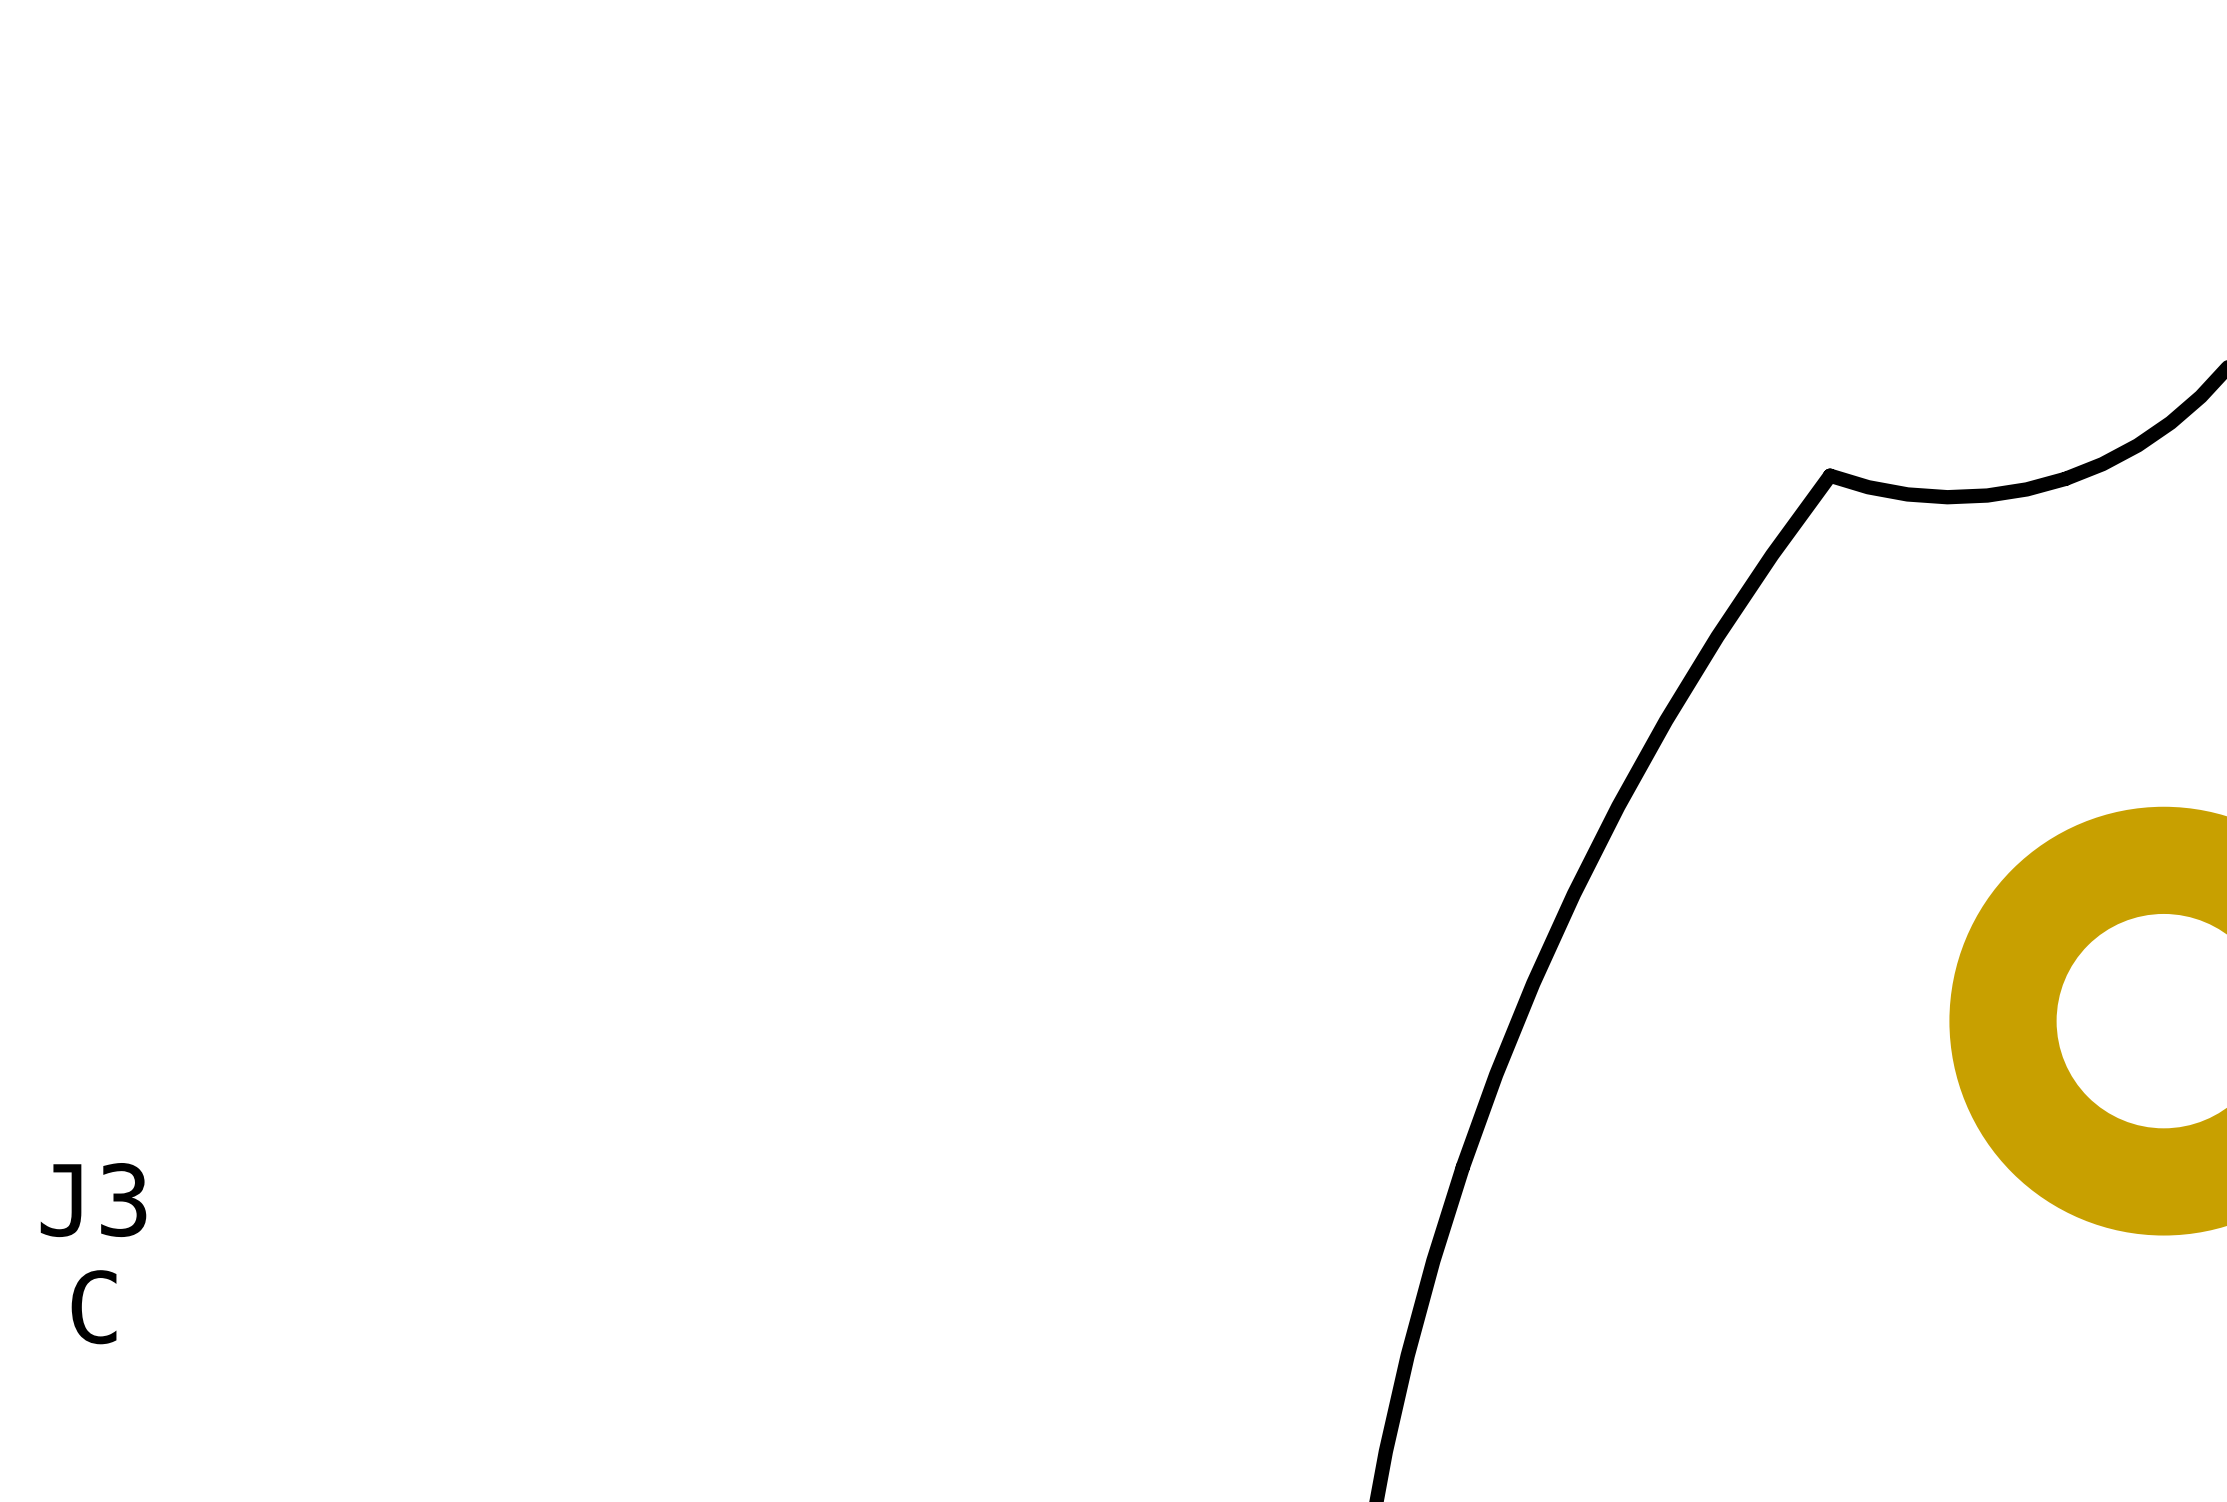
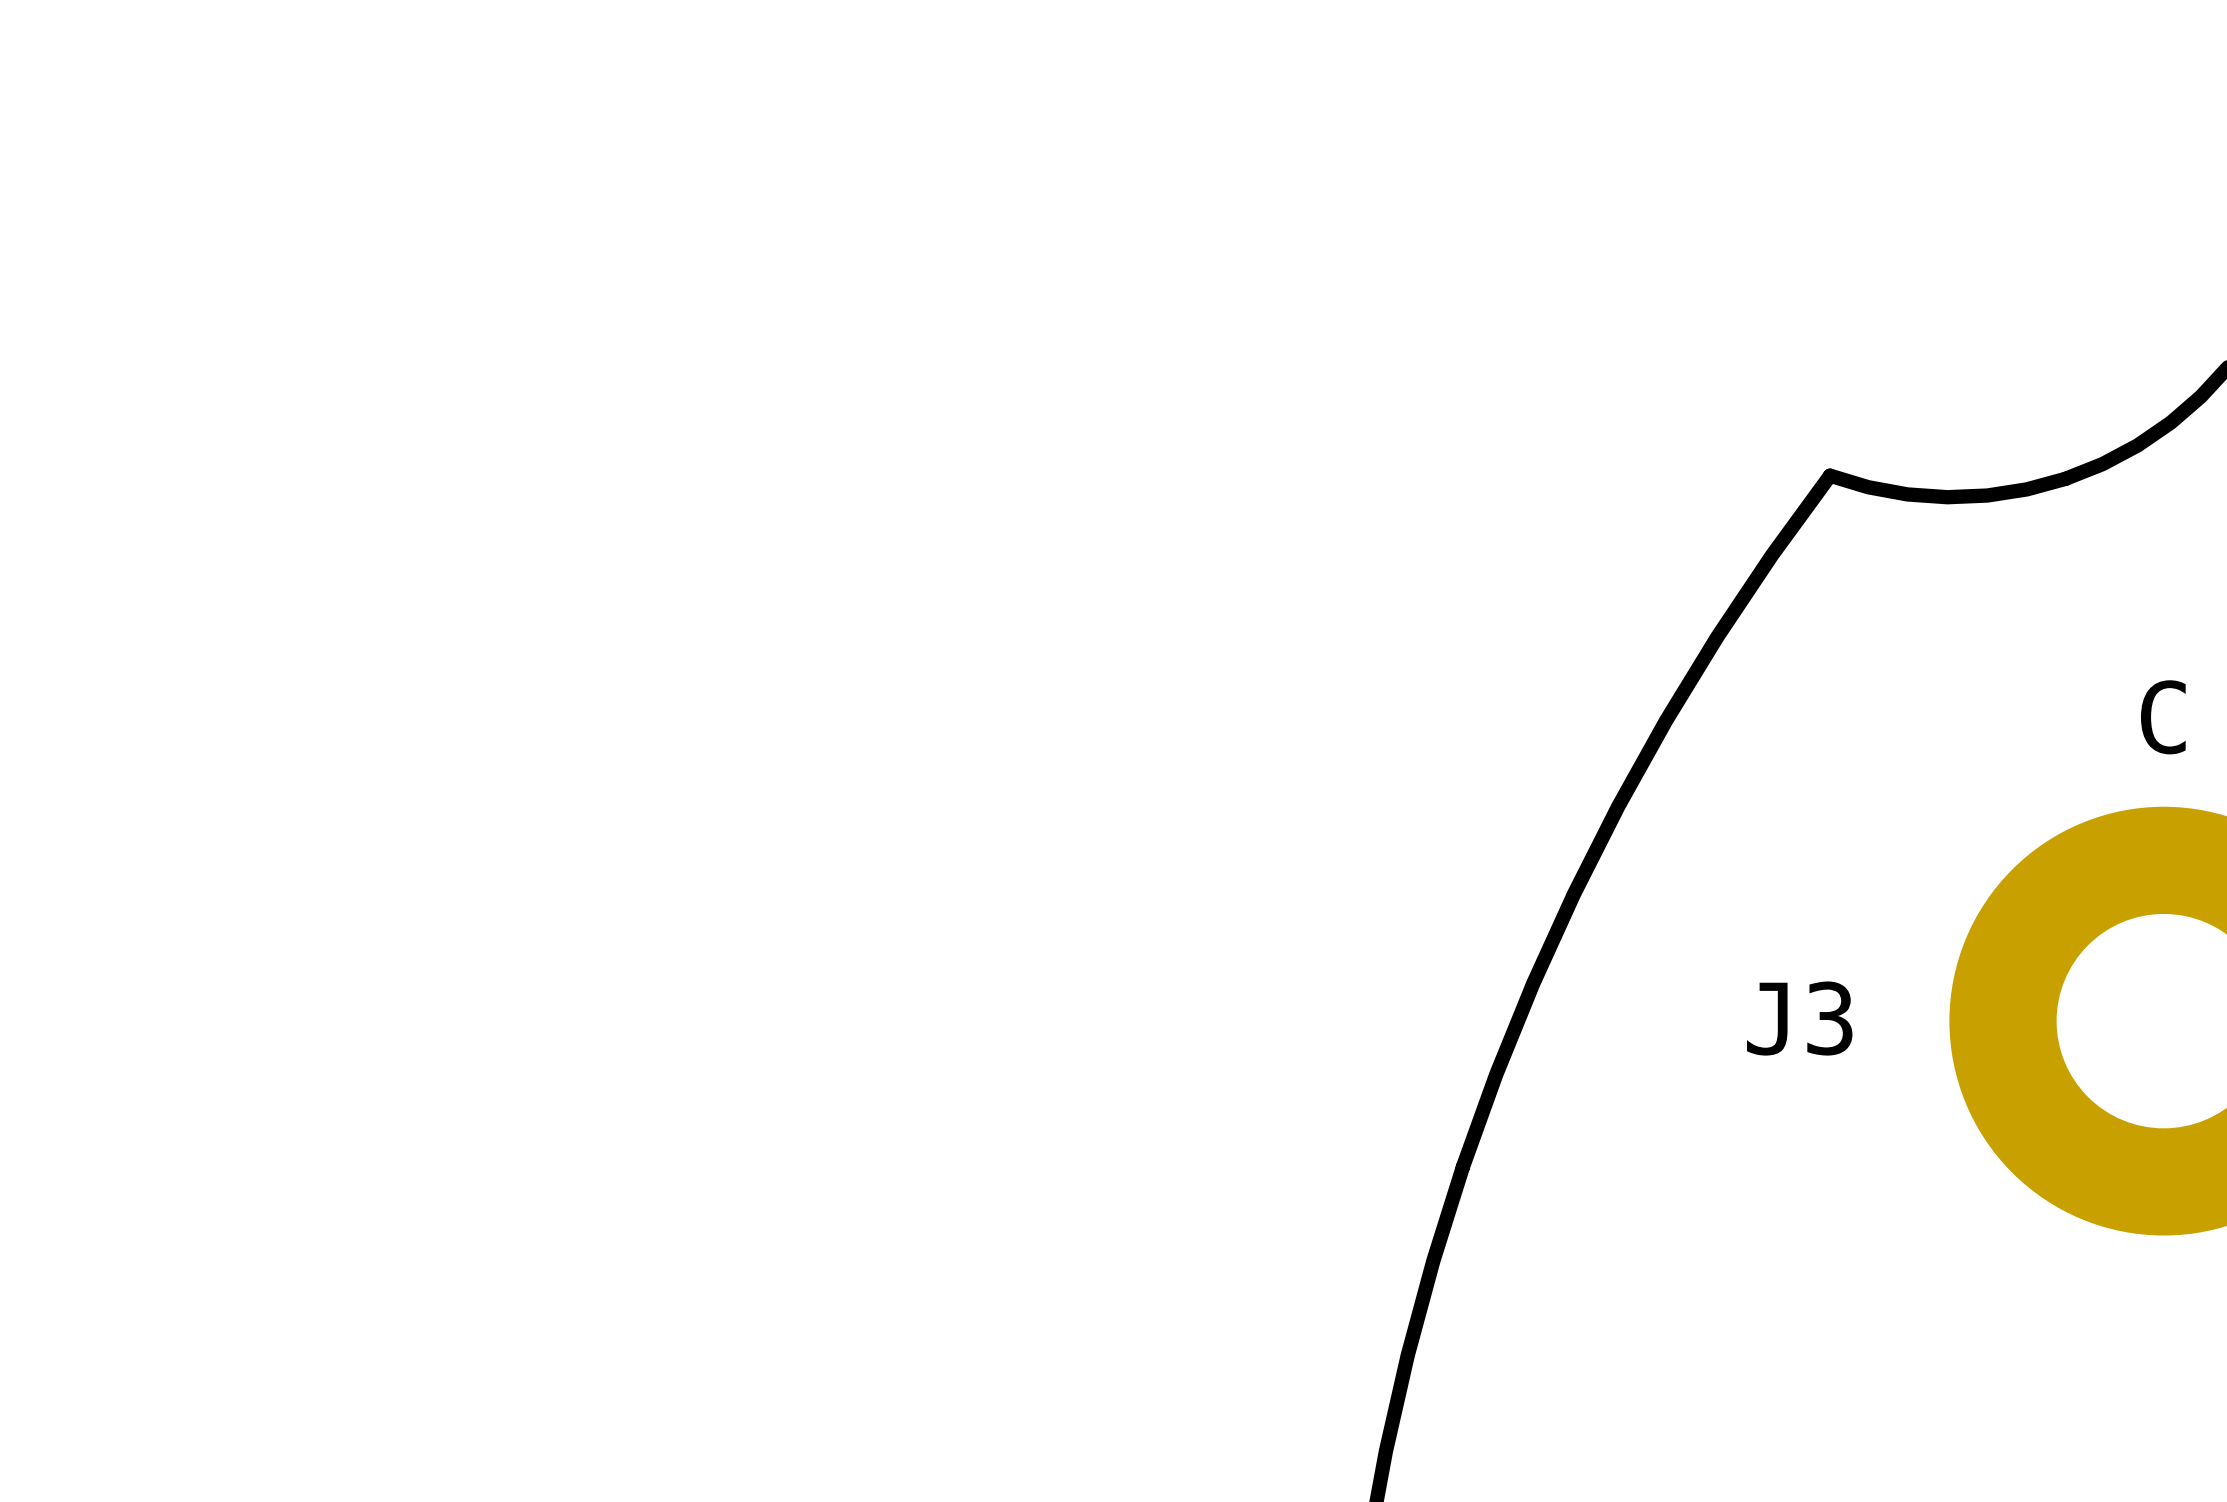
J3 name position: J3 (93, 1200) -> J3 (1799, 1018)
J3 value position: C (94, 1307) -> C (2163, 717)

